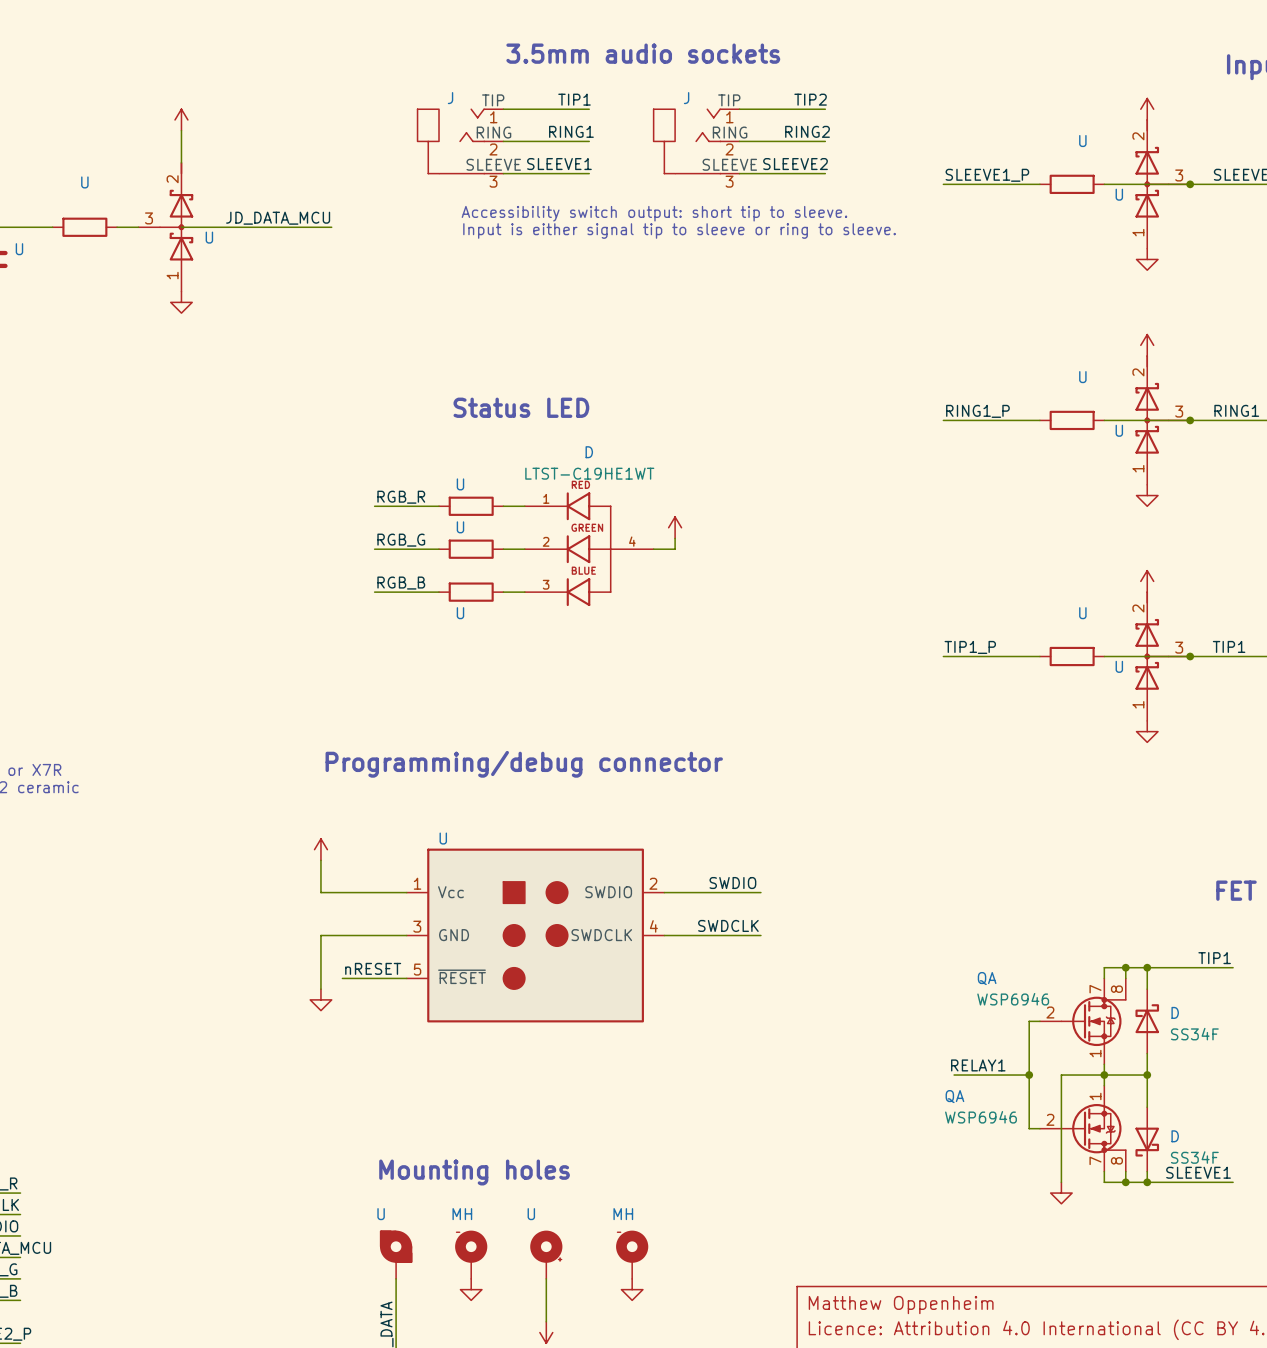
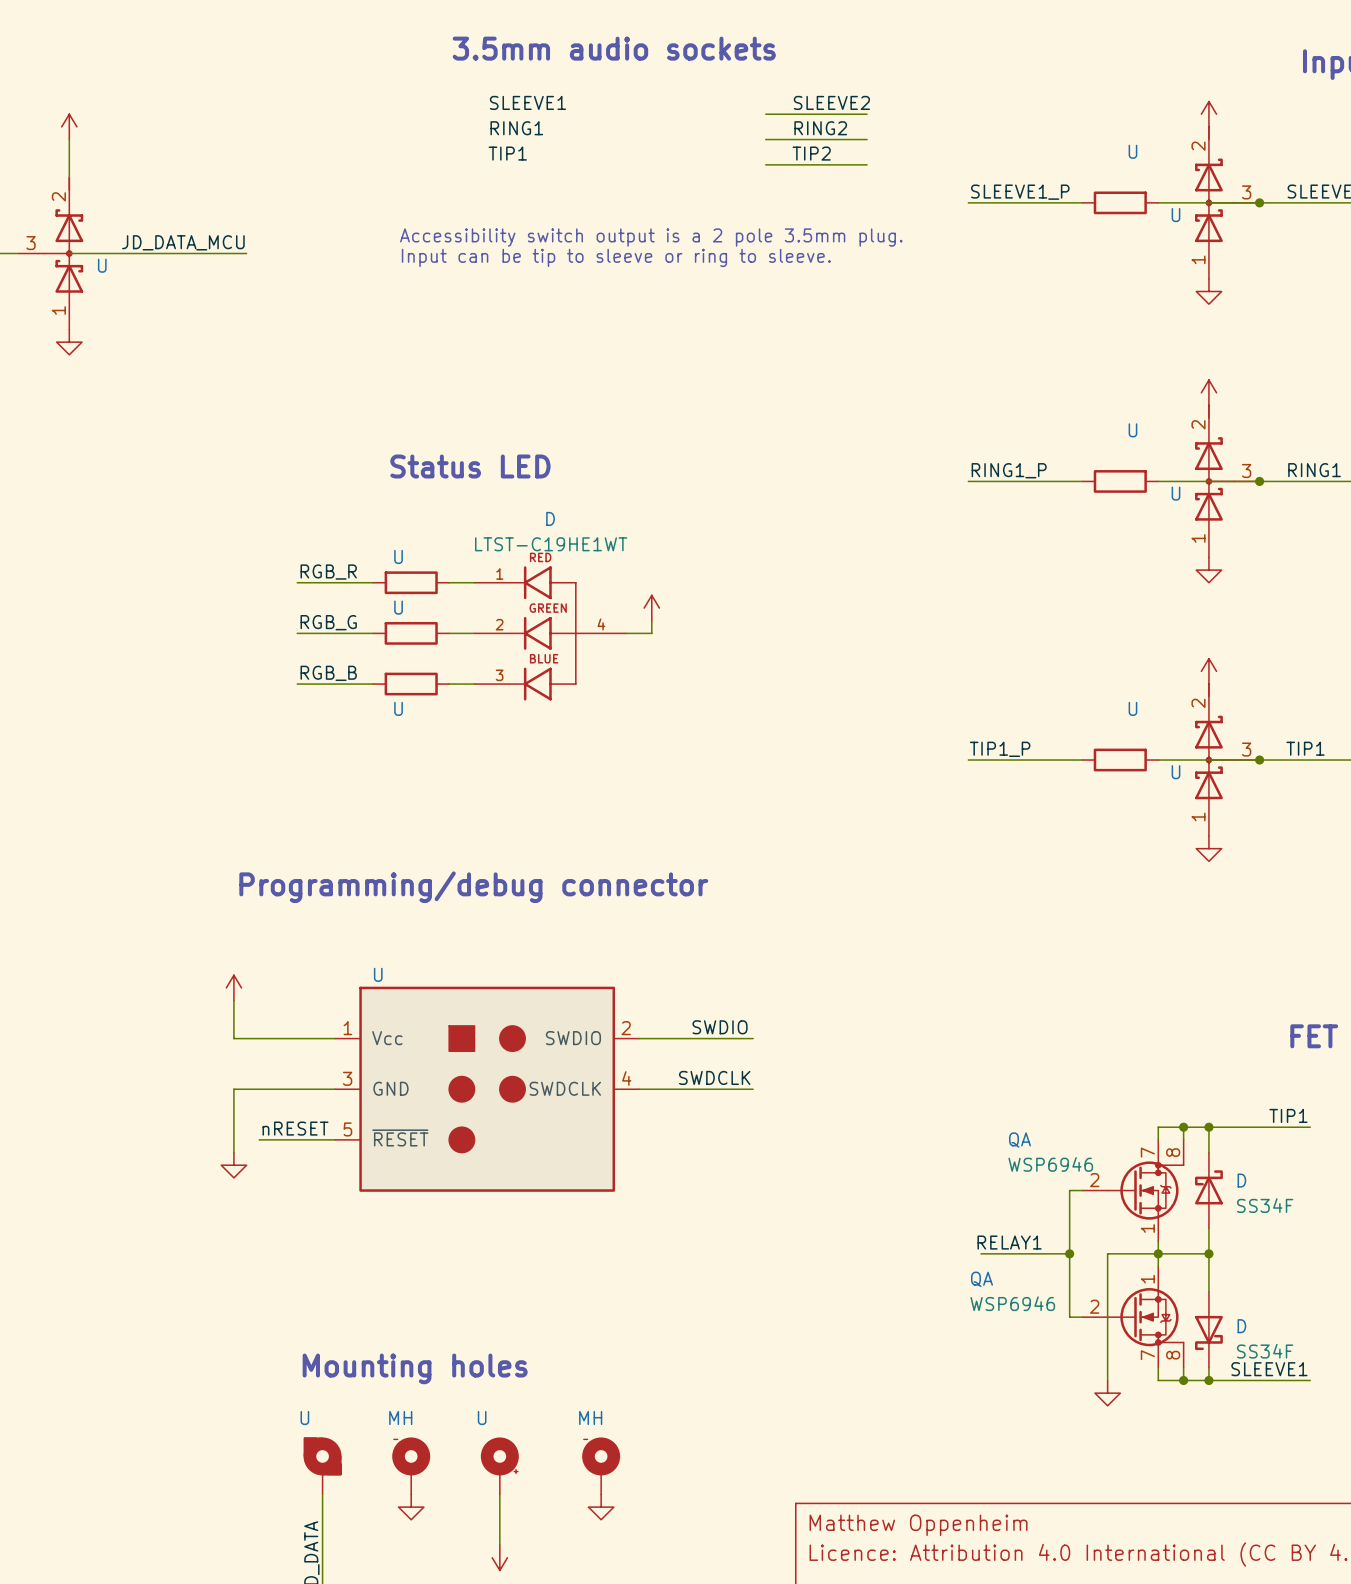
label position: TIP1 (574, 99) -> TIP1 (507, 153)
label: TIP2 (810, 99) -> SLEEVE2 (831, 102)
wire: (503, 109) (589, 109) -> none
wire: (739, 109) (771, 109) -> (829, 114) (867, 114)
label position: RING1 (571, 131) -> RING1 (516, 128)
label position: RING2 (807, 131) -> RING2 (820, 128)
J: (460, 141) -> none
wire: (503, 141) (589, 141) -> none
J: (696, 141) -> none
wire: (739, 141) (825, 141) -> (765, 139) (867, 139)
label: none -> TIP2 (811, 153)
label position: SLEEVE1 (559, 164) -> SLEEVE1 (527, 102)
label: SLEEVE2 (795, 164) -> none
wire: (503, 173) (589, 173) -> none
wire: (739, 173) (825, 173) -> (765, 164) (867, 164)
text: Accessibility switch output: short tip to sleeve. (654, 213) -> Accessibility switch output is a 2 pole 3.5mm plug. (651, 237)
text: Input is either signal tip to sleeve or ring to sleeve. (679, 231) -> Input can be tip to sleeve or ring to sleeve. (616, 257)

